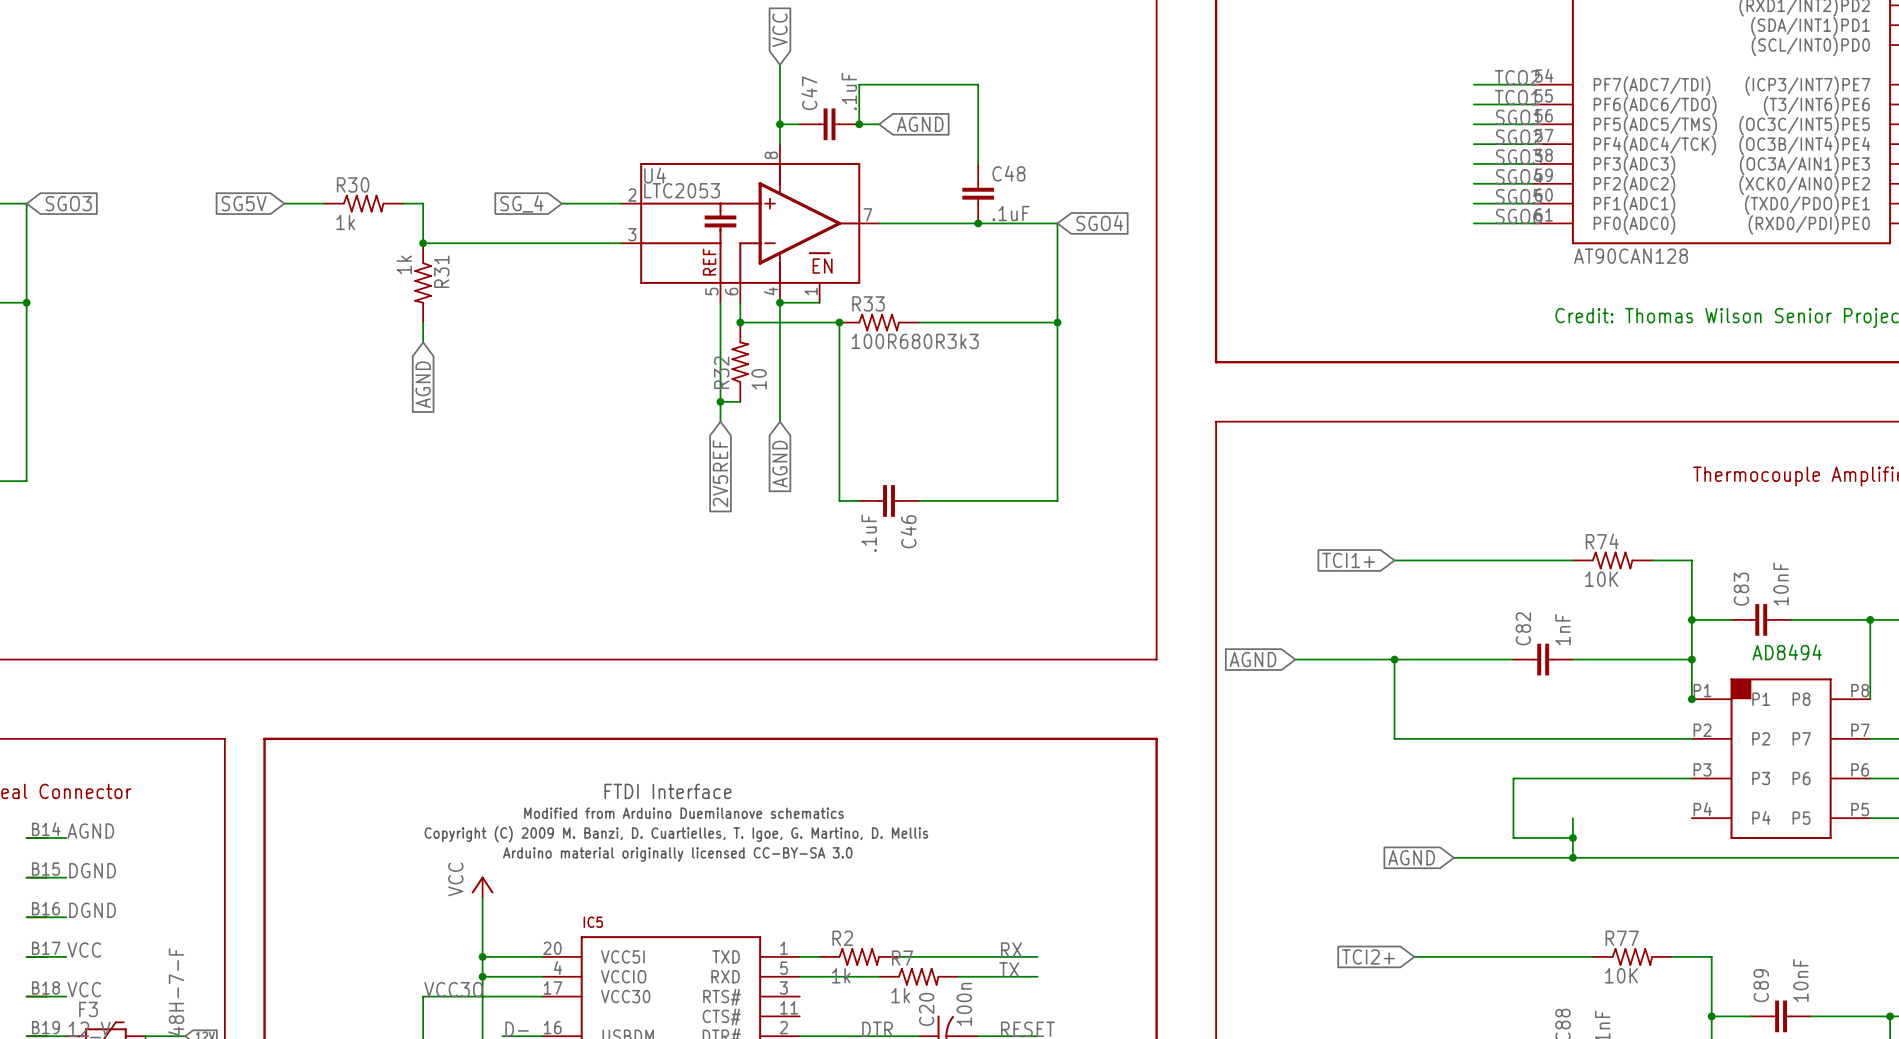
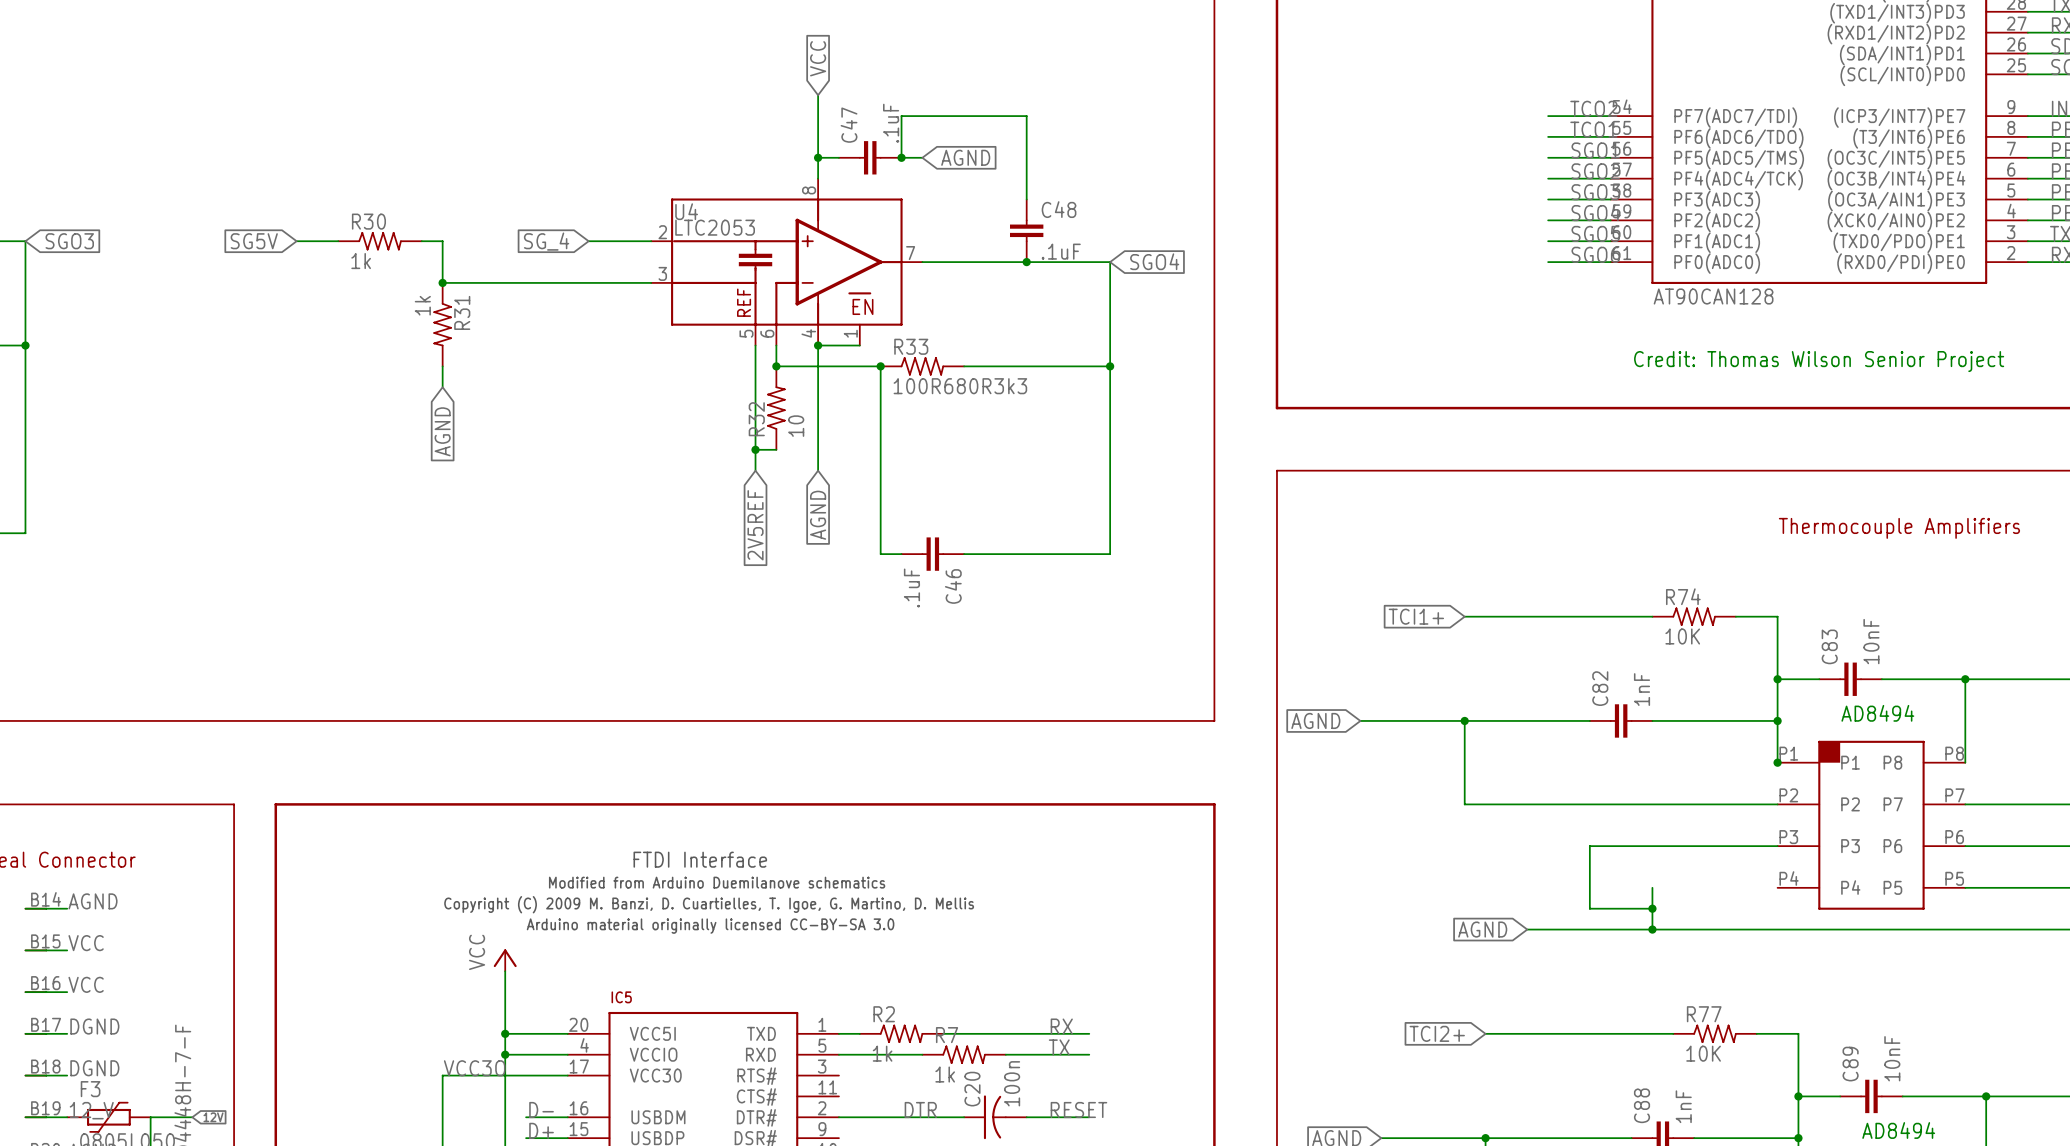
label: DGND (92, 870) -> VCC (86, 943)
label: DGND (92, 910) -> VCC (86, 984)
label: VCC (84, 949) -> DGND (94, 1026)
label: VCC (84, 989) -> DGND (94, 1068)

